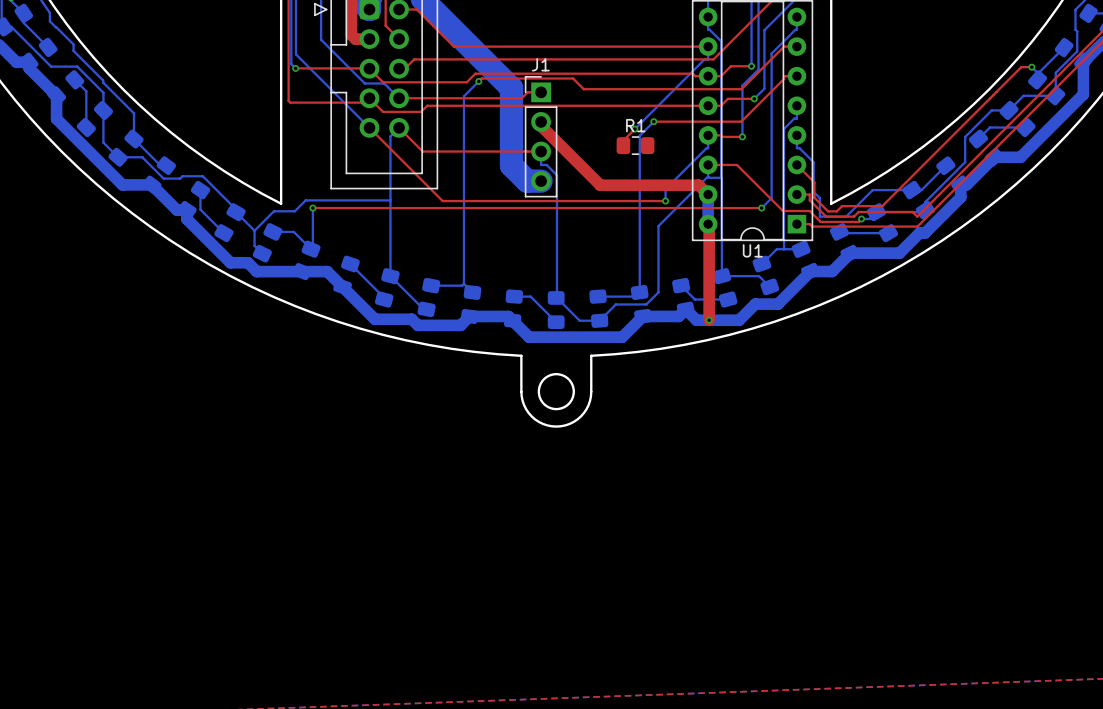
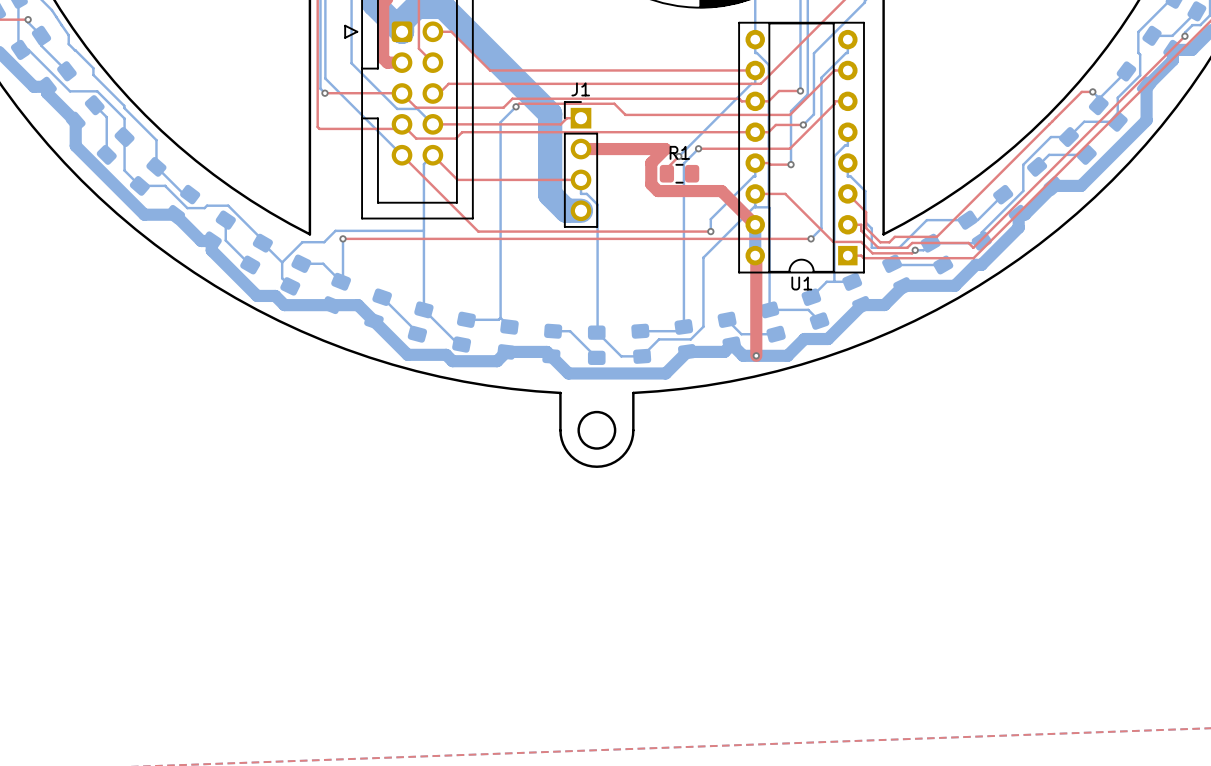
top track: (541, 121) (541, 126) (600, 185) (698, 185) -> (581, 149) (665, 149) (651, 163) (651, 184) (657, 191) (721, 191) (745, 215)

